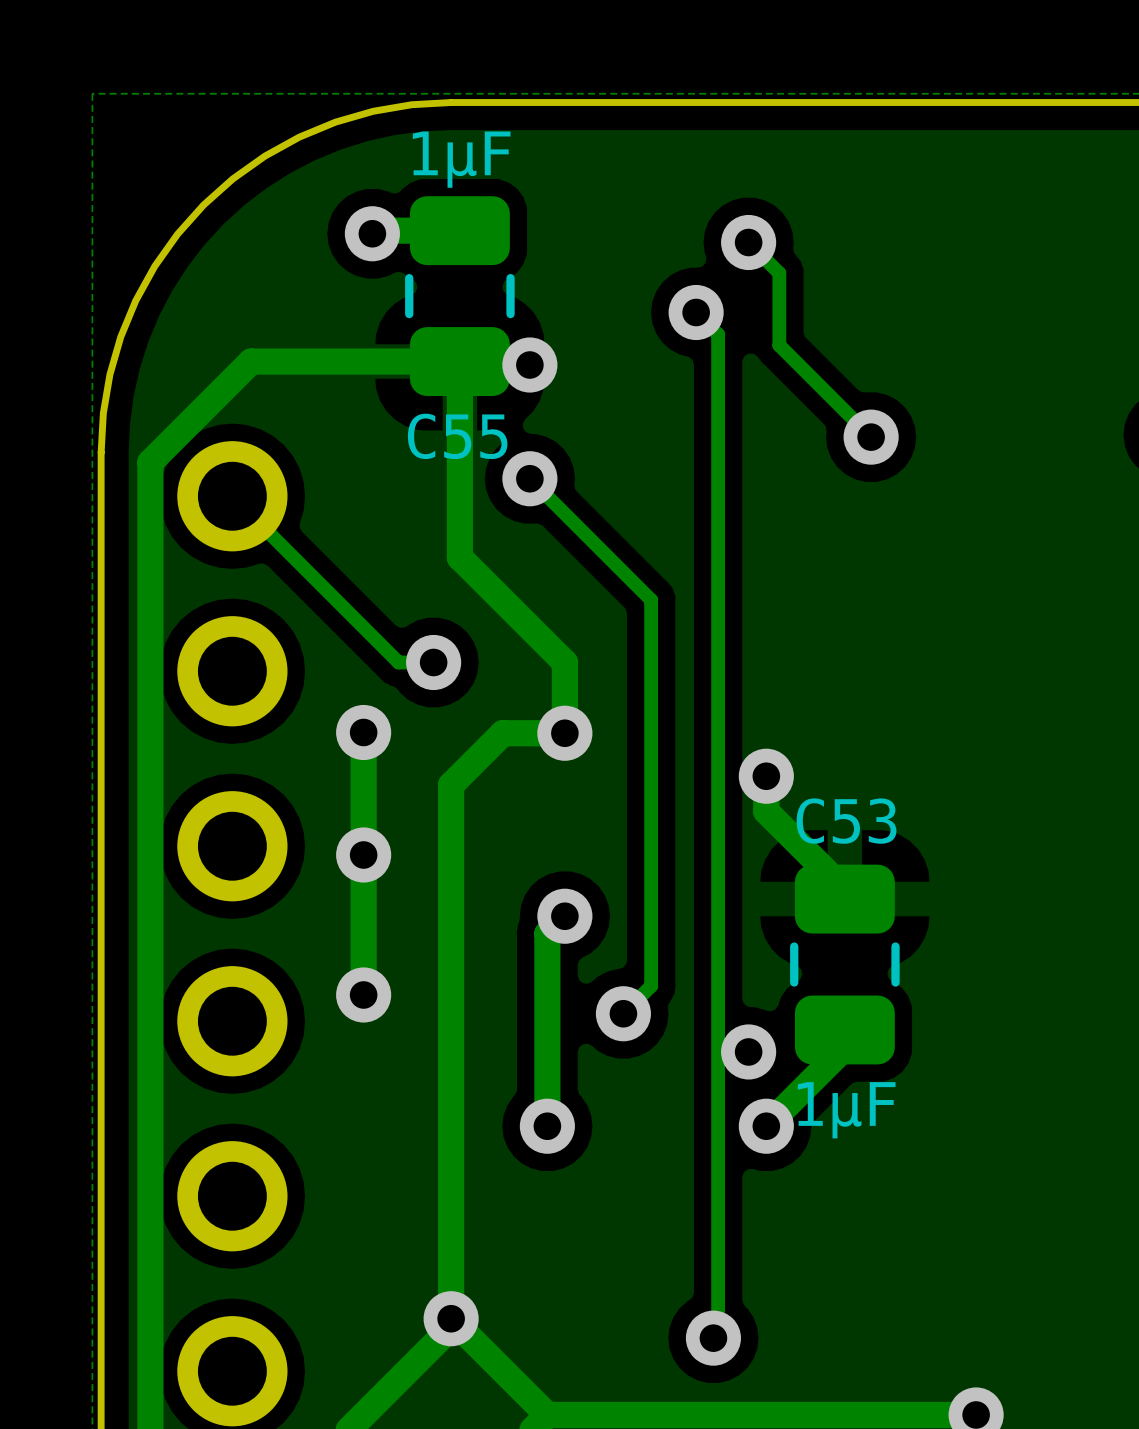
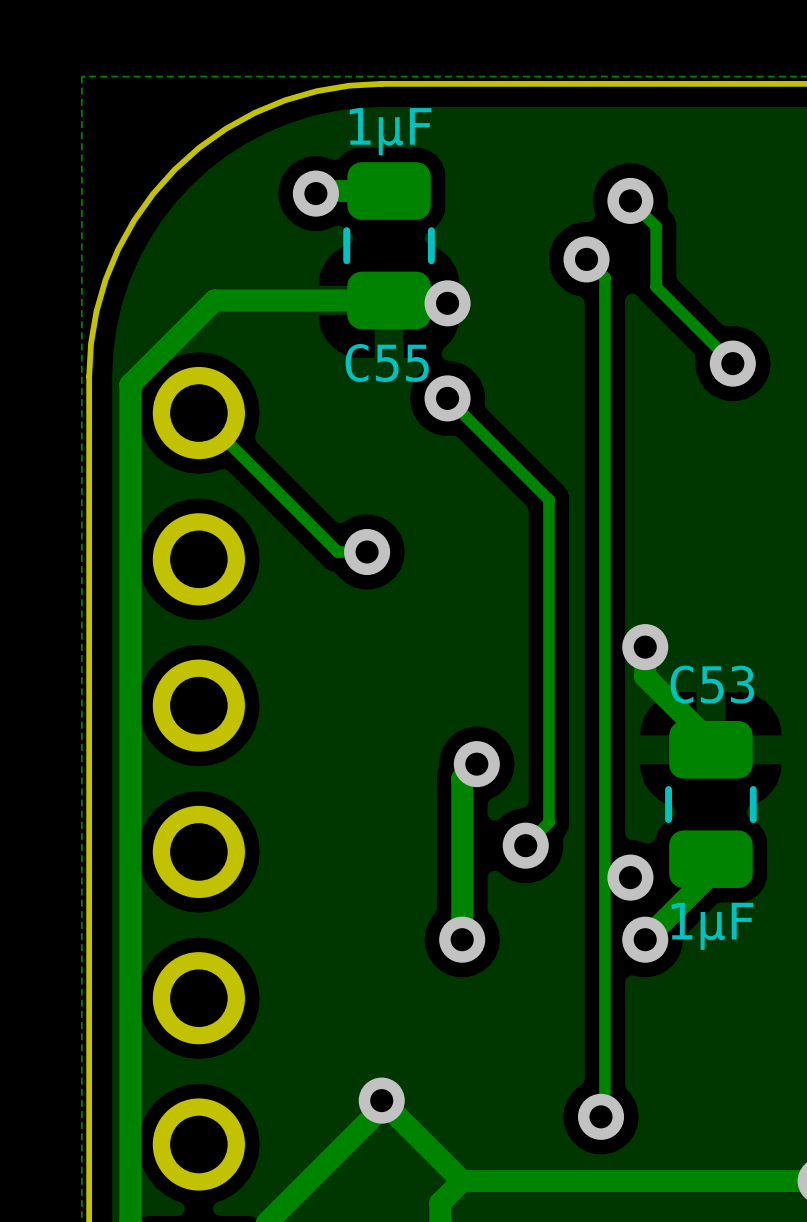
track: (459, 361) (459, 557) (564, 662) (564, 733) (502, 733) (451, 784) (451, 1318) -> none
track: (363, 732) (363, 994) -> none
via: (363, 732) -> none
via: (564, 733) -> none
via: (363, 854) -> none
via: (363, 994) -> none

